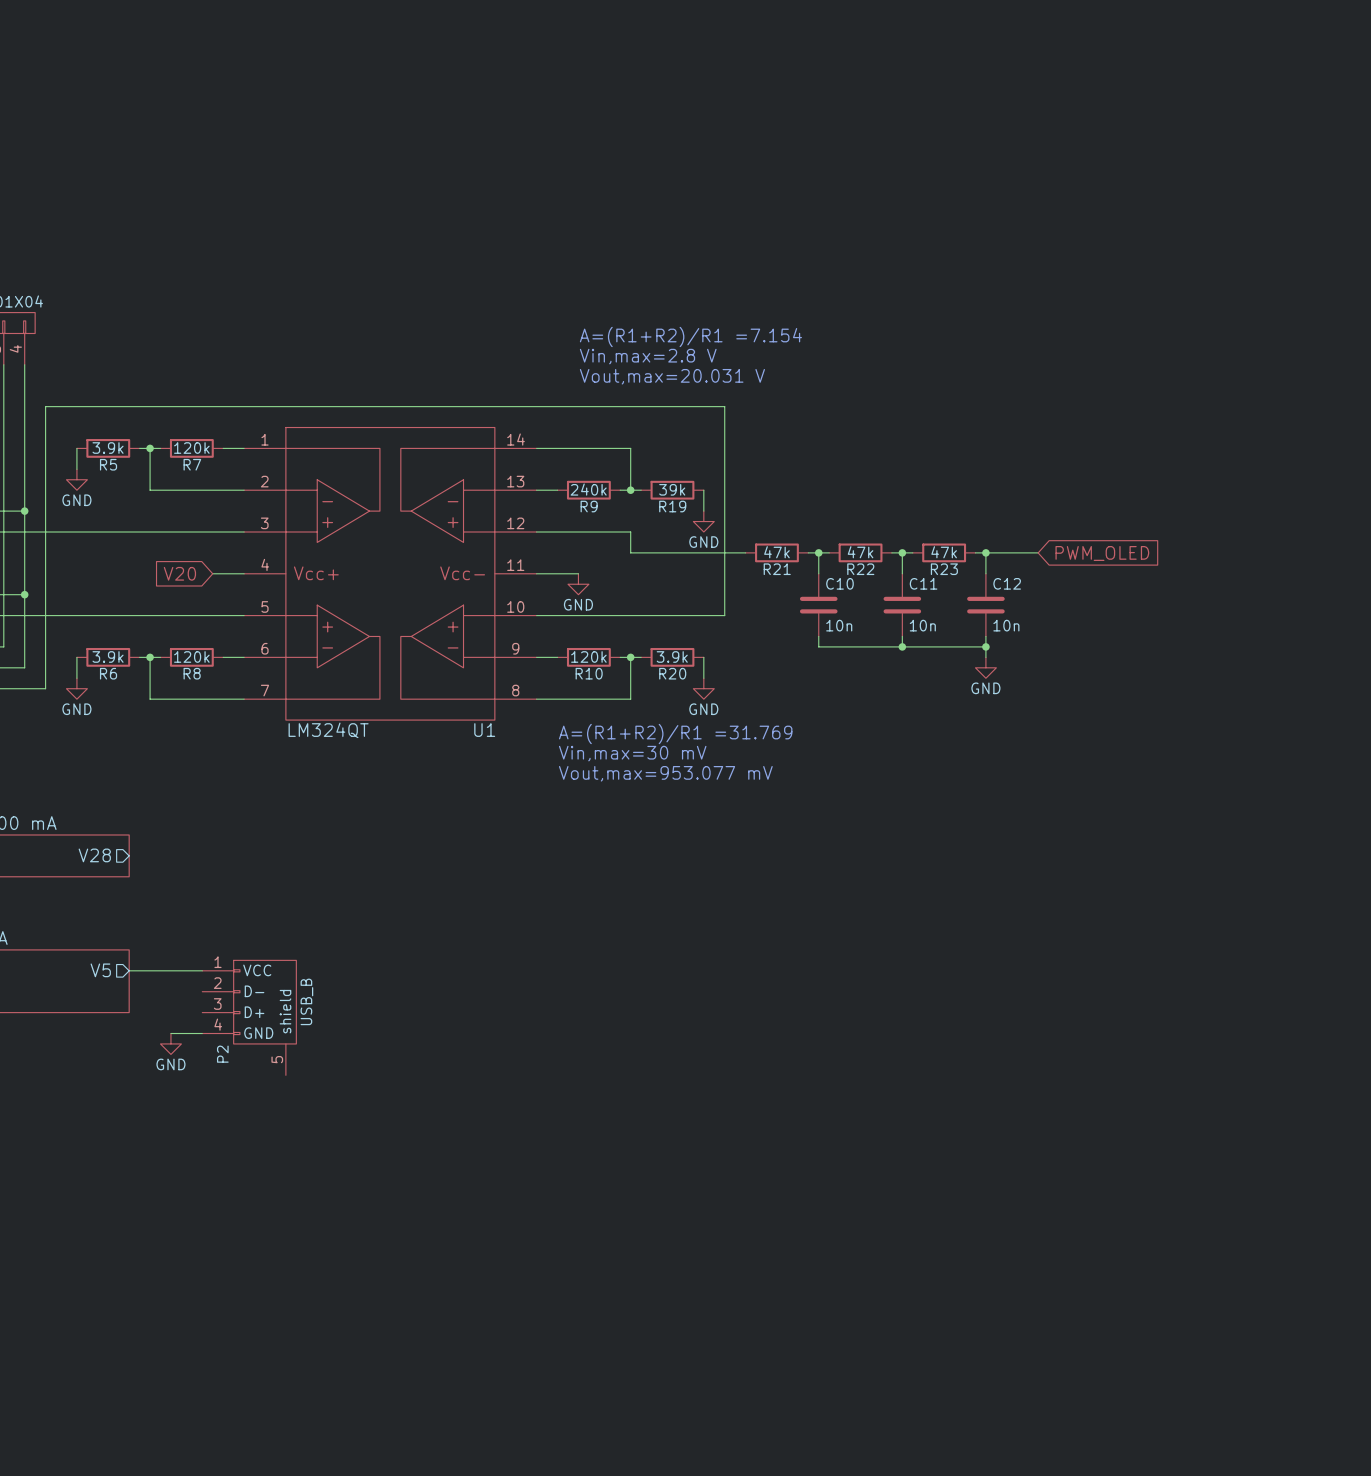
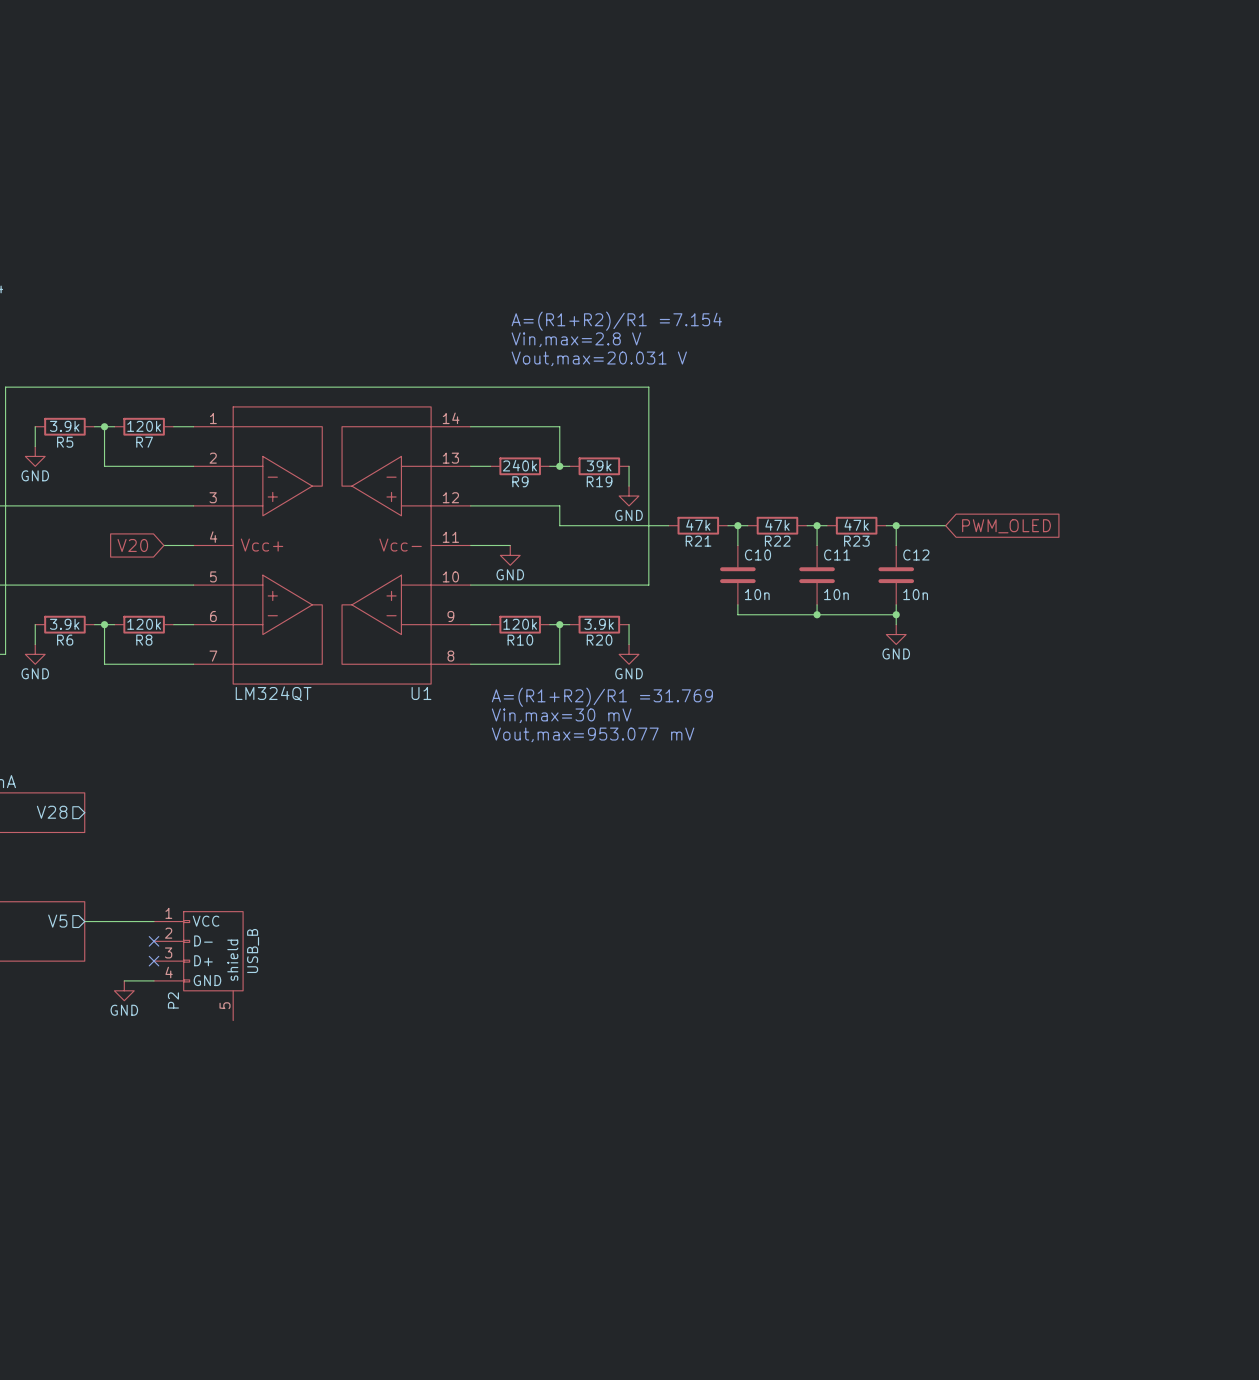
no-connect mark: none -> (154, 941)
no-connect mark: none -> (154, 961)

